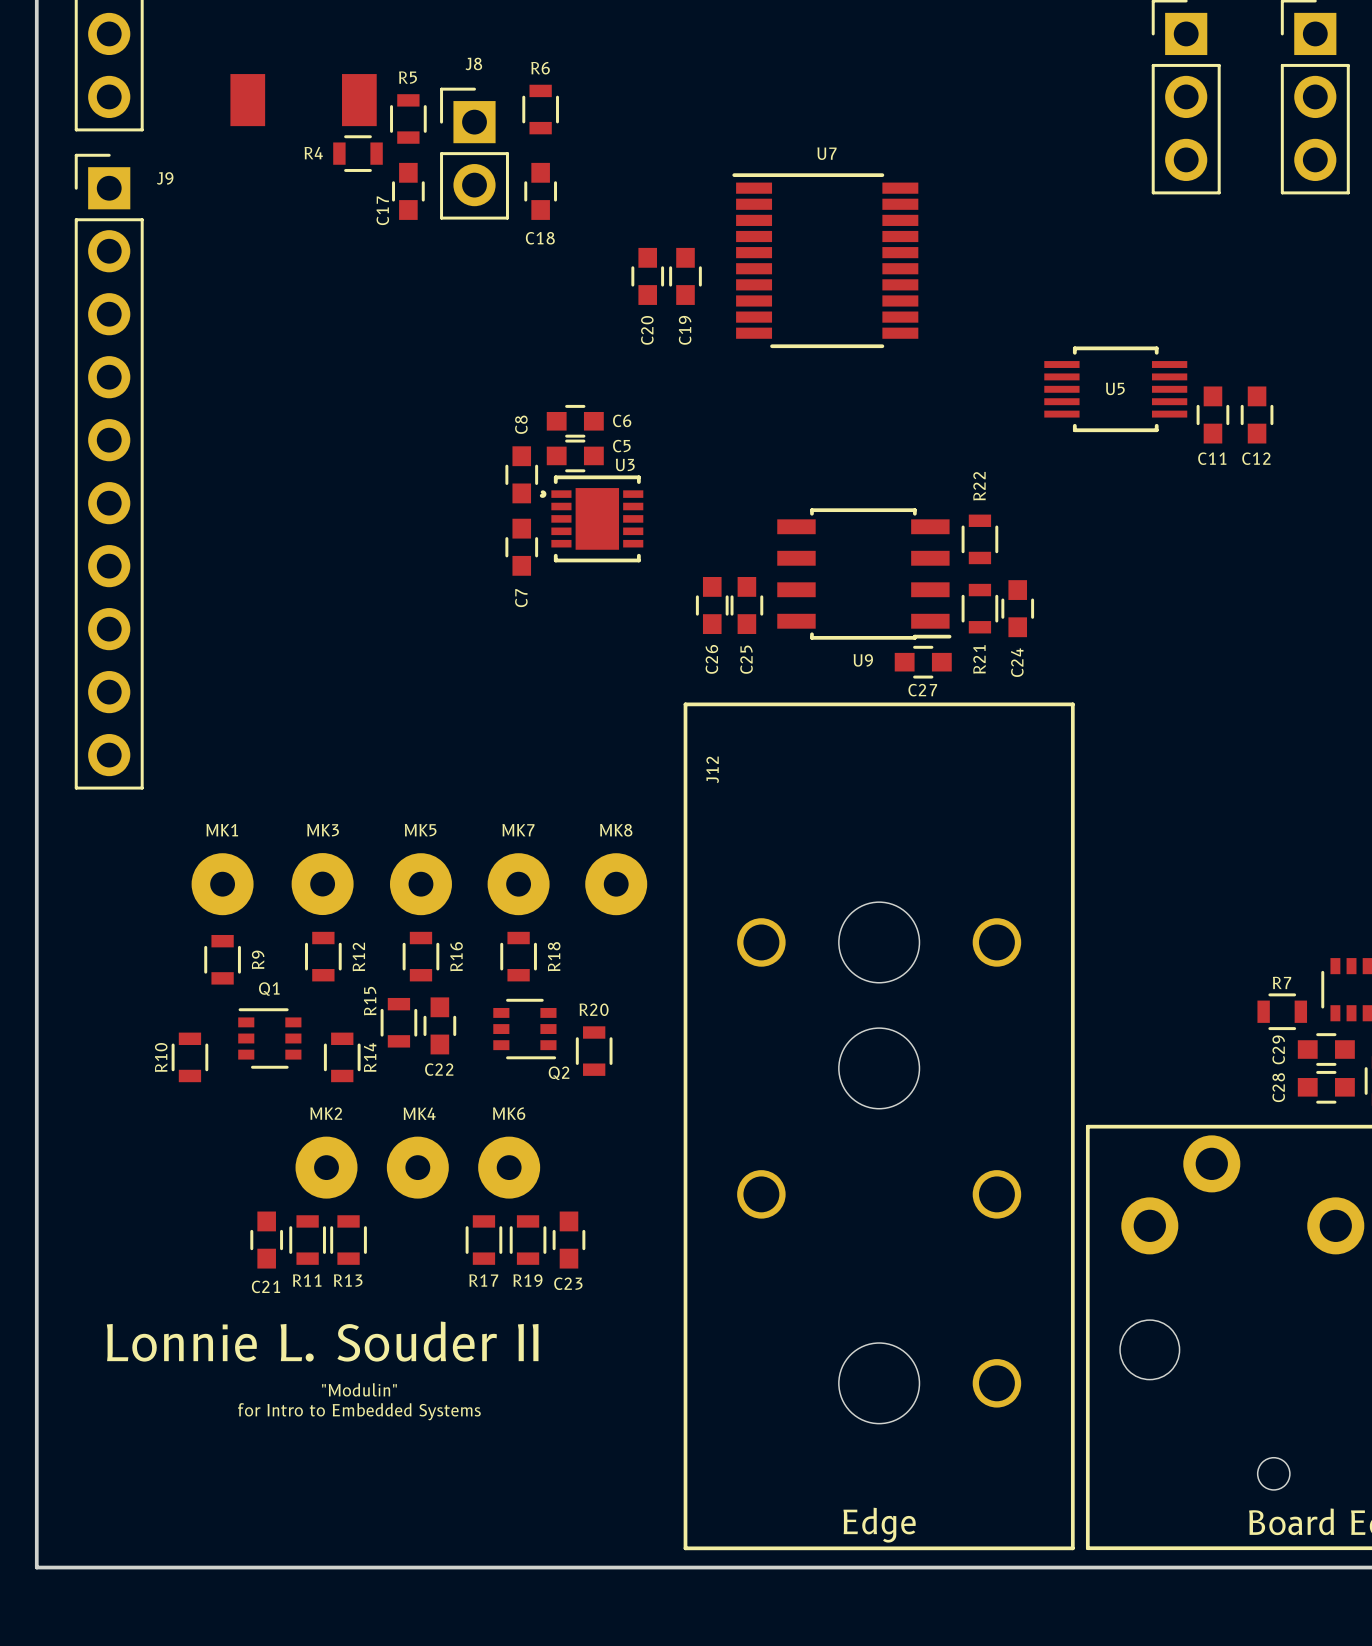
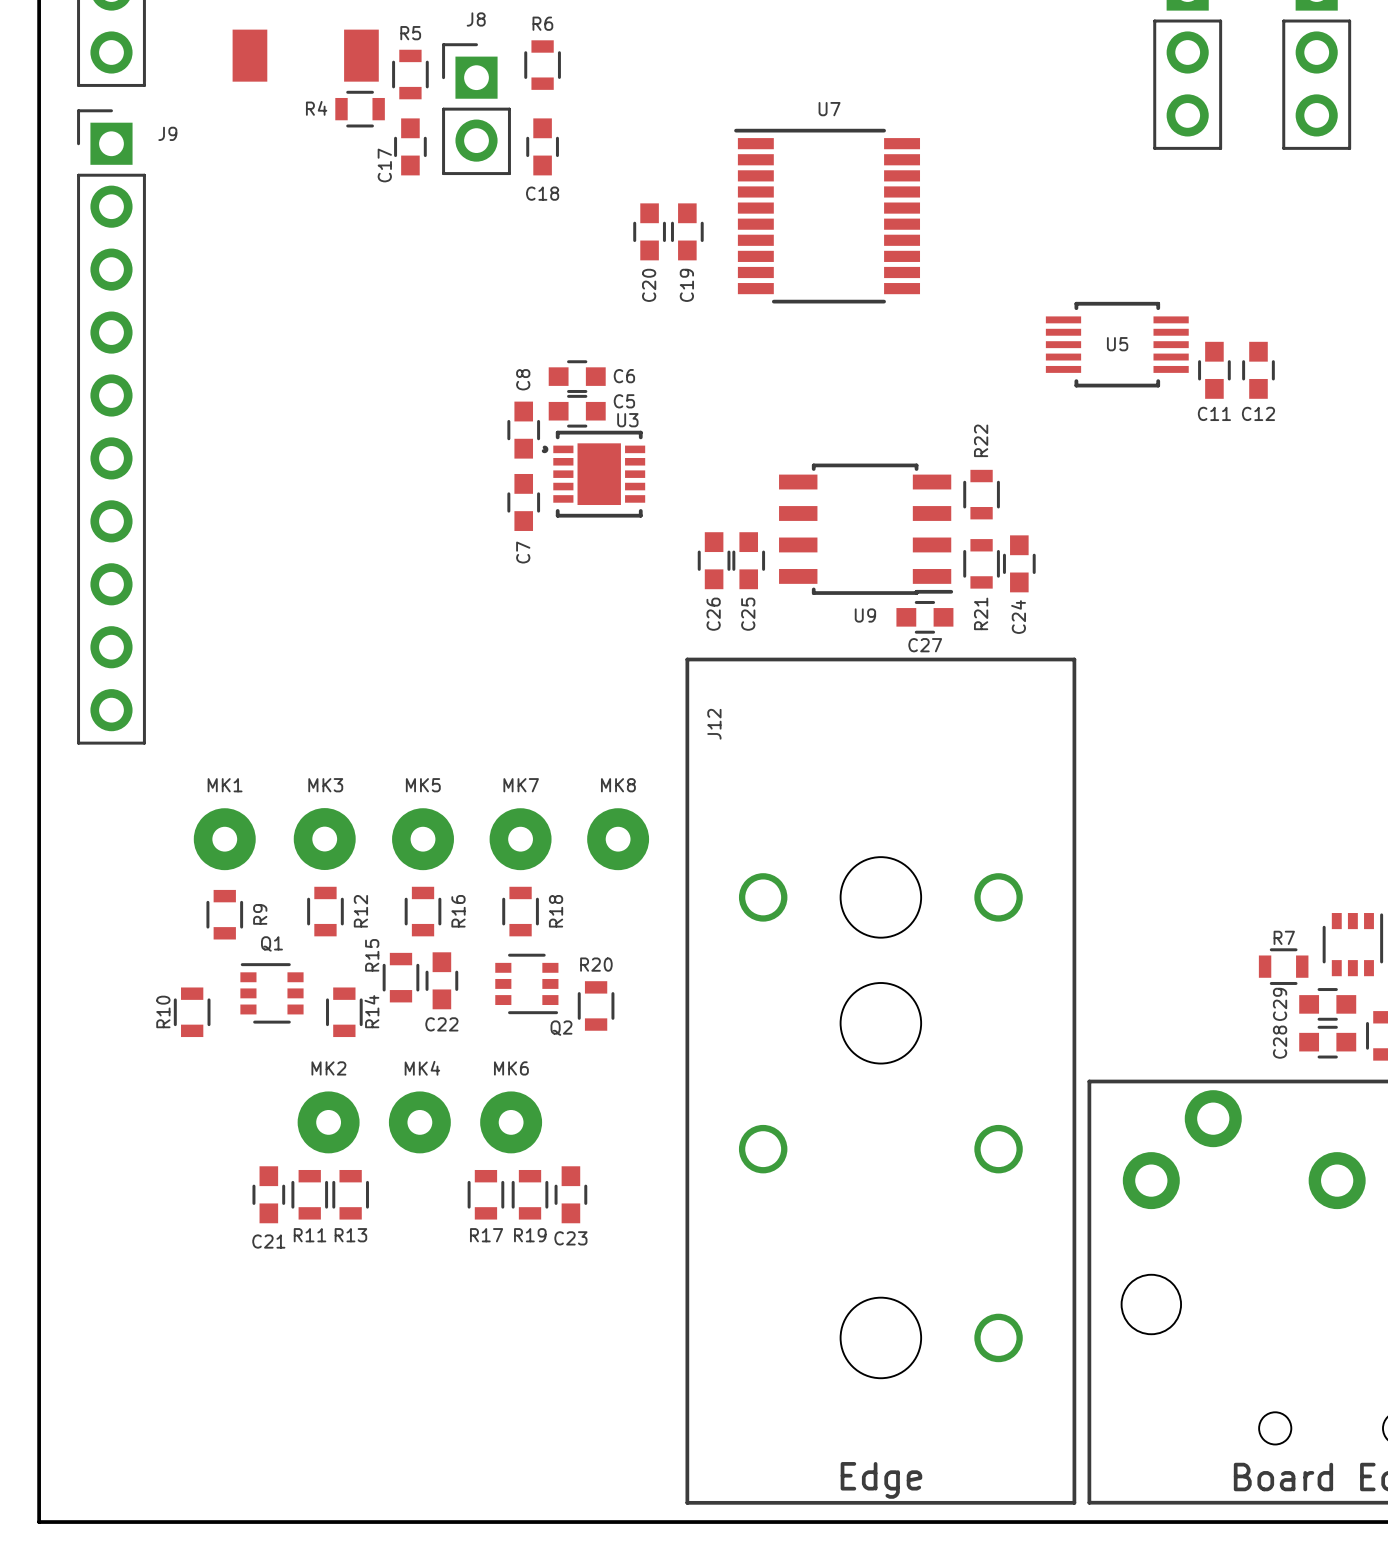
text: Lonnie L. Souder II (322, 1341) -> none
text: "Modulin" (359, 1389) -> none
text: for Intro to Embedded Systems (359, 1411) -> none

